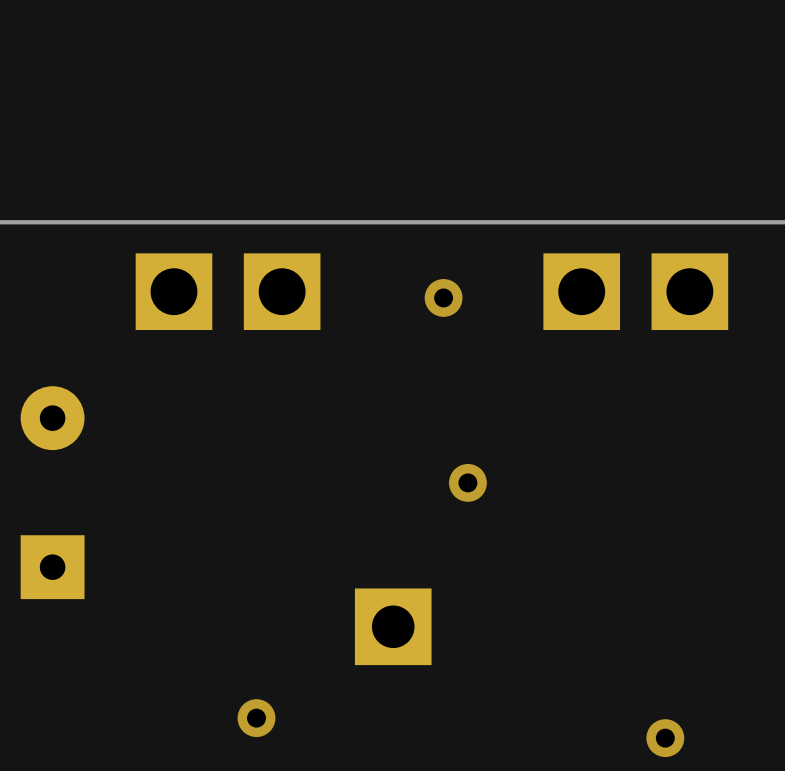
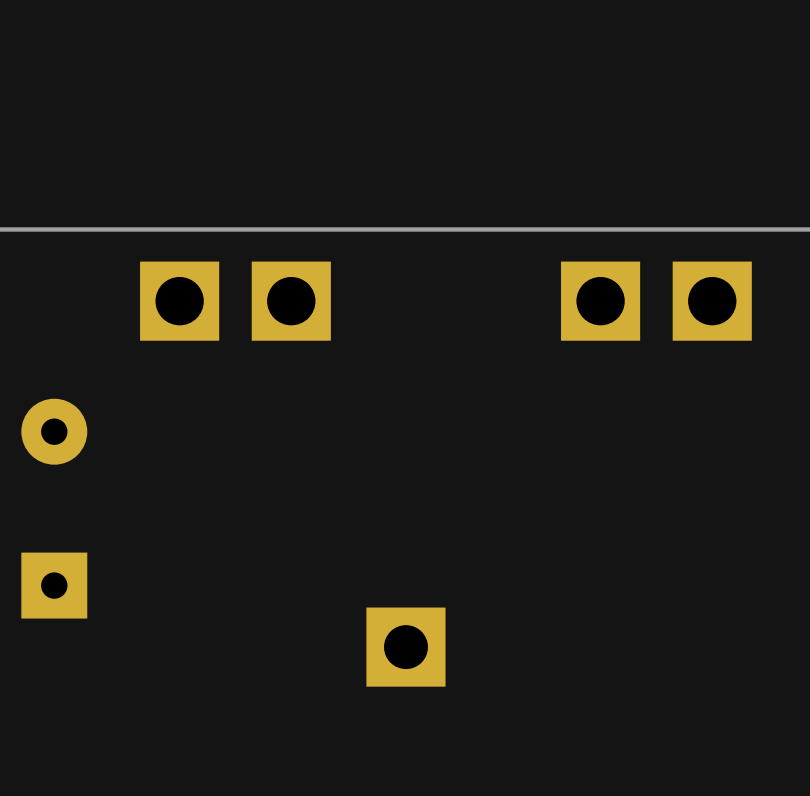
via: (443, 297) -> none
via: (467, 482) -> none
via: (256, 718) -> none
via: (665, 738) -> none

